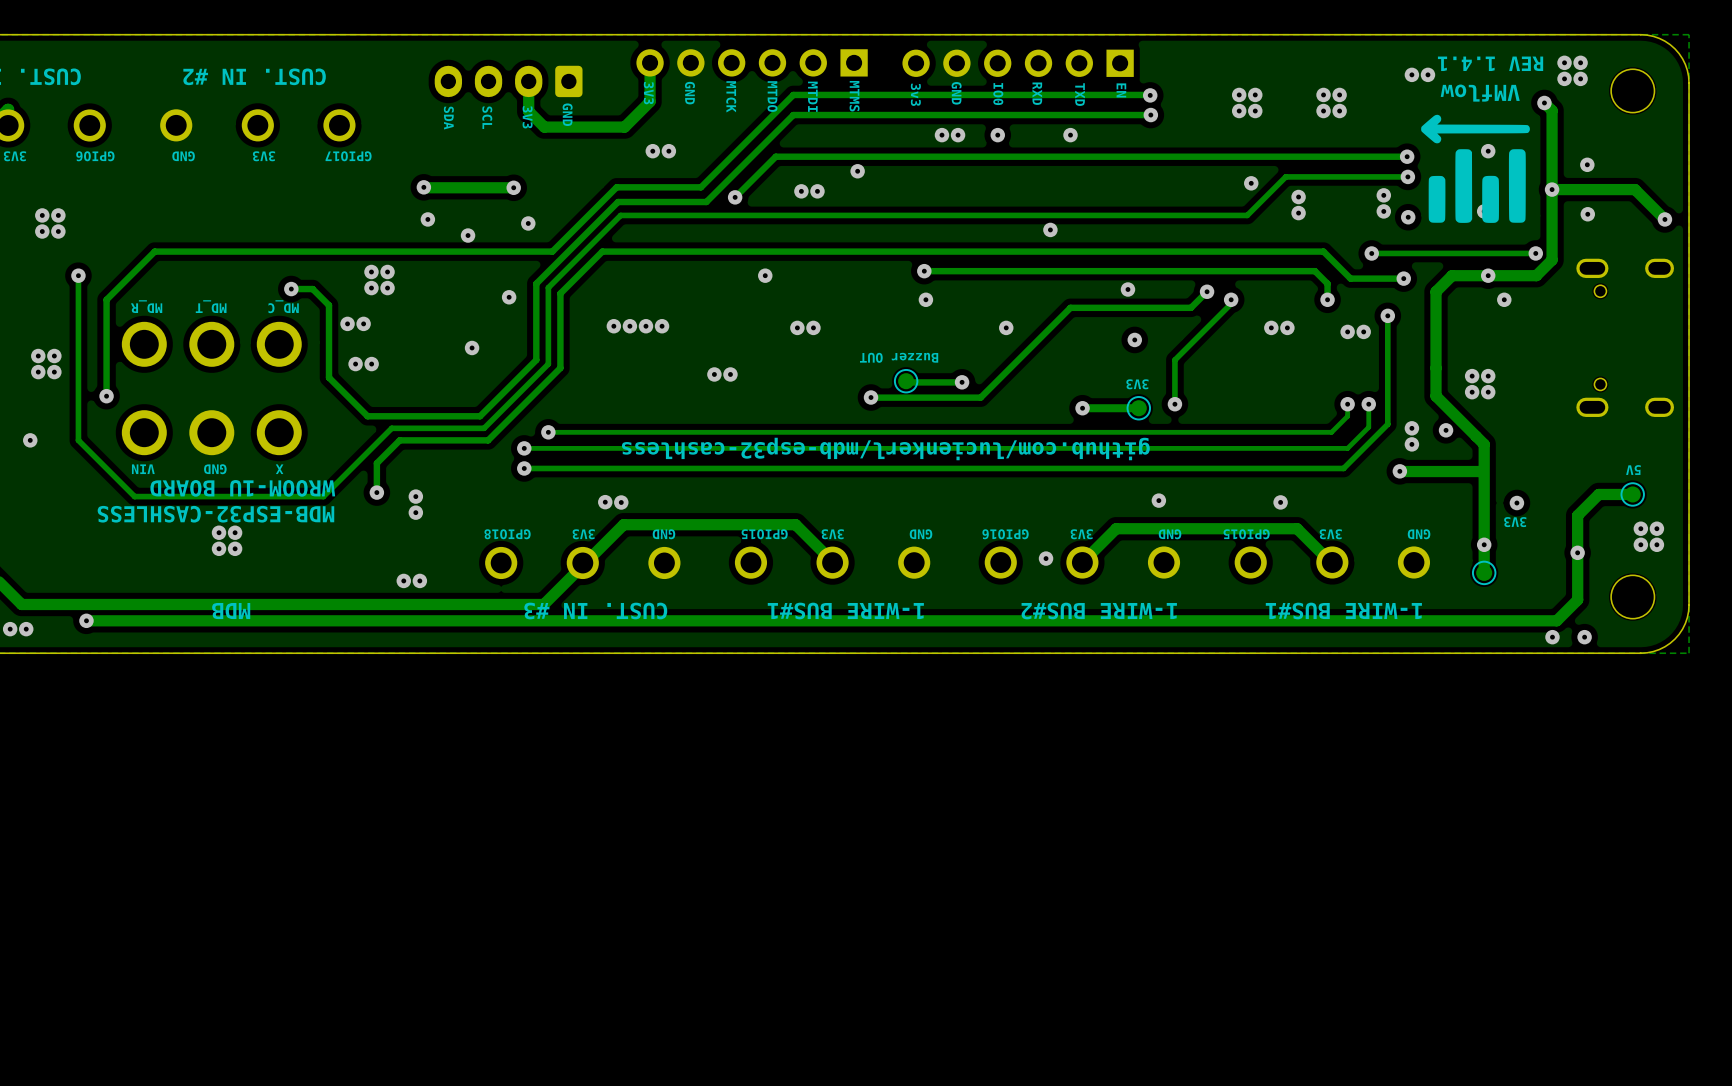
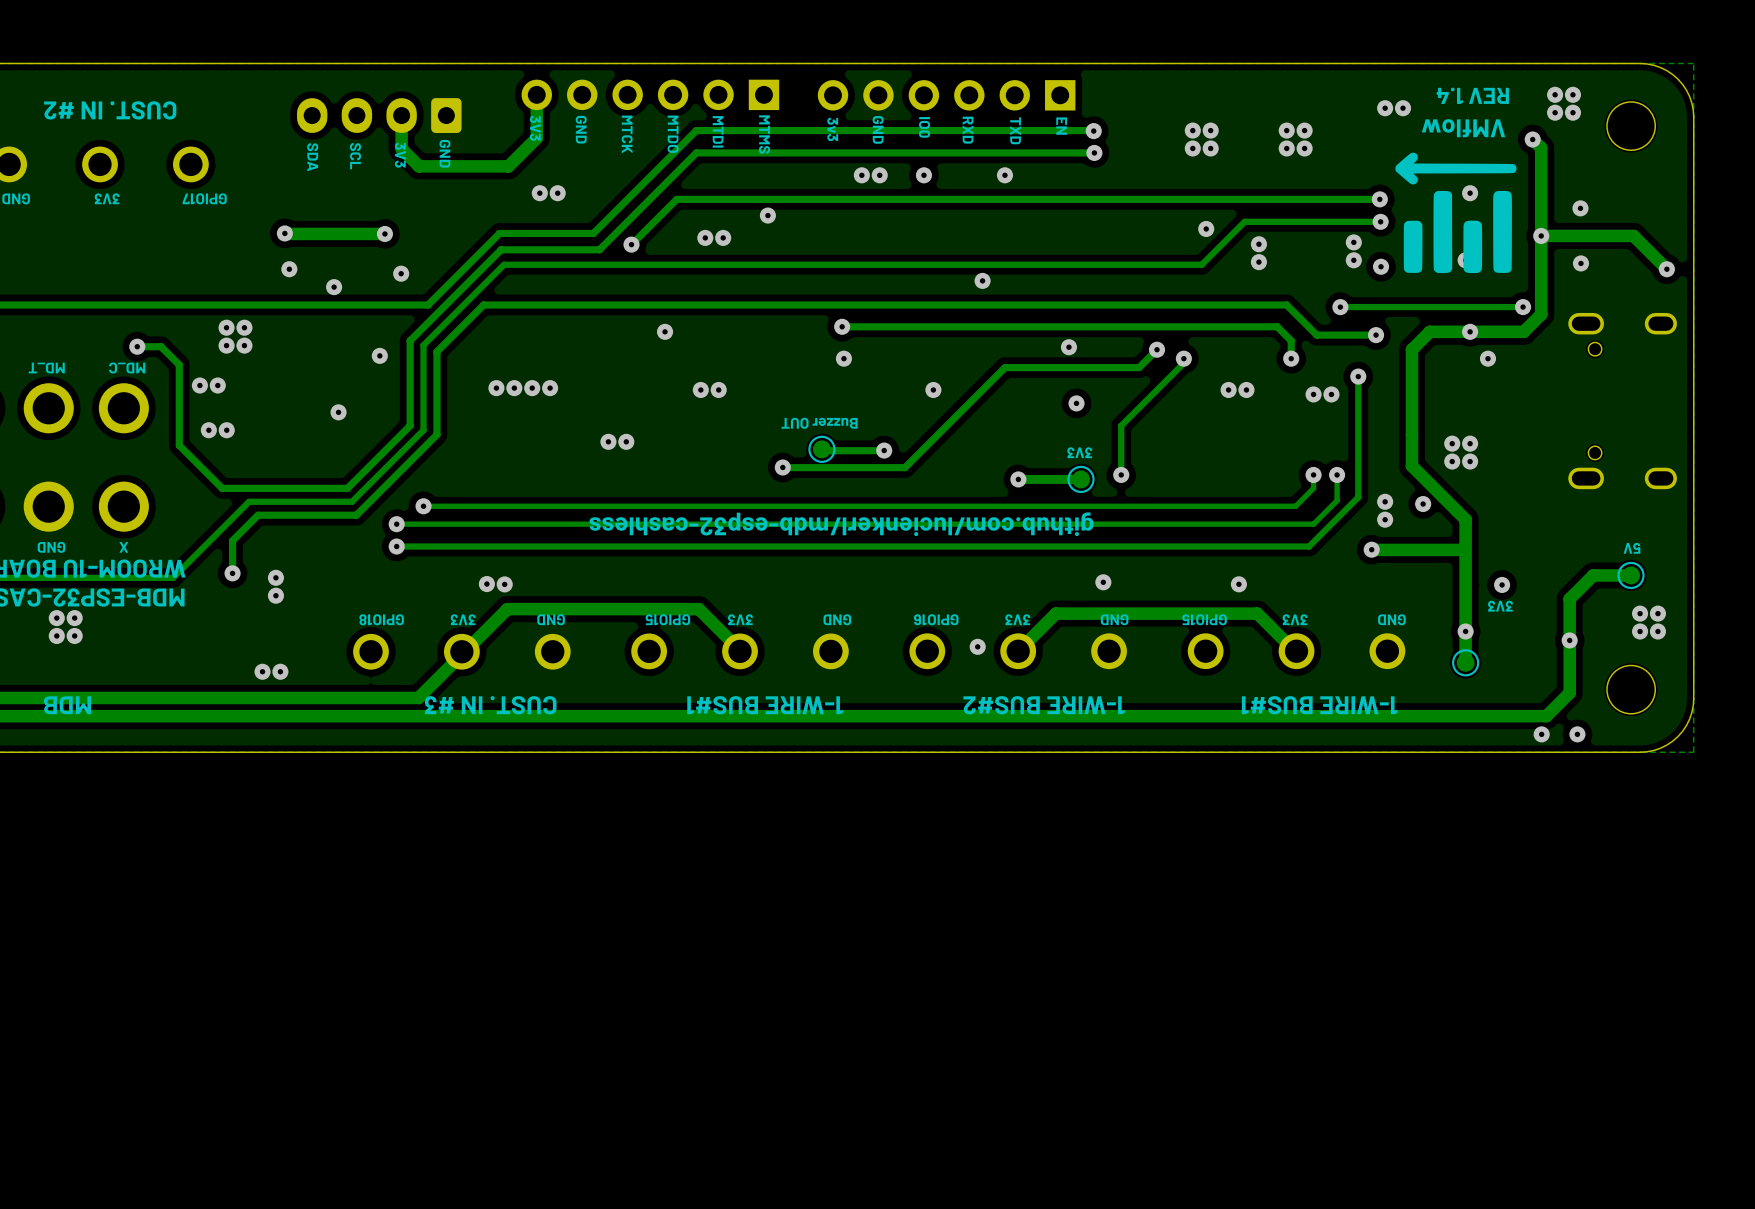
text: REV 1.4.1 (1490, 63) -> REV 1.4 (1472, 95)

